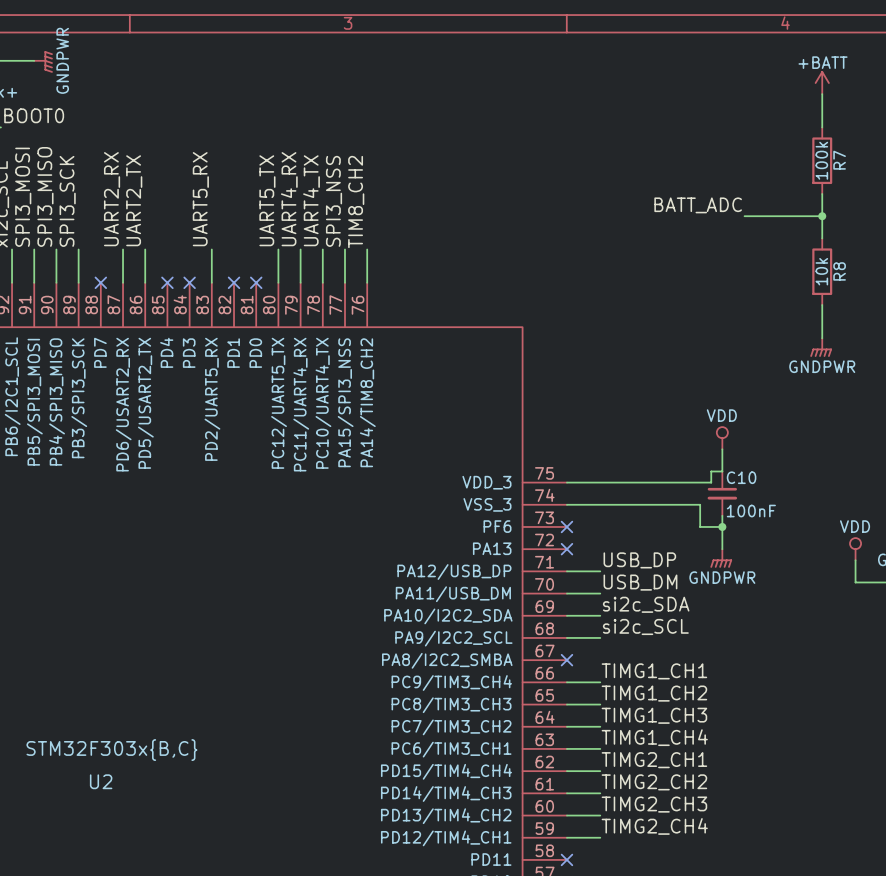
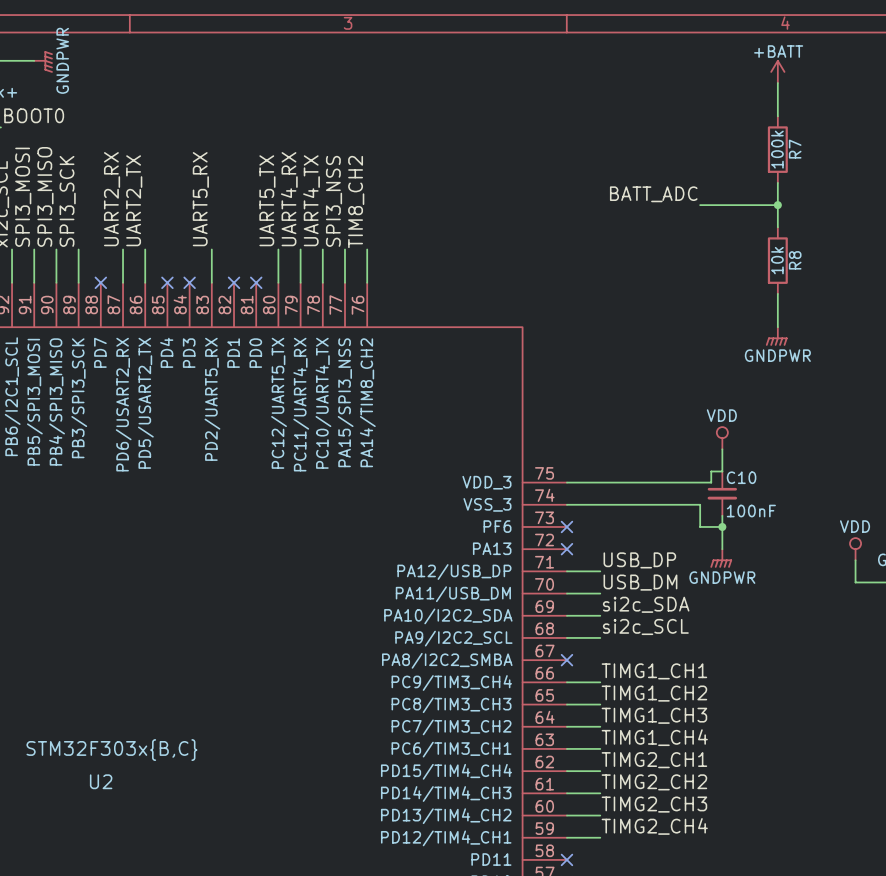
power symbol position: +BATT (822, 83) -> +BATT (777, 71)
wire: (822, 94) (822, 127) -> (777, 83) (777, 116)
R7 position: (822, 160) -> (777, 149)
wire: (822, 194) (822, 238) -> (777, 182) (777, 227)
label position: BATT_ADC (698, 205) -> BATT_ADC (653, 194)
wire: (744, 216) (822, 216) -> (700, 205) (777, 205)
junction position: (822, 216) -> (777, 205)
R8 position: (822, 271) -> (777, 260)
wire: (822, 305) (822, 338) -> (777, 293) (777, 327)
power symbol position: GNDPWR (821, 347) -> GNDPWR (776, 336)

